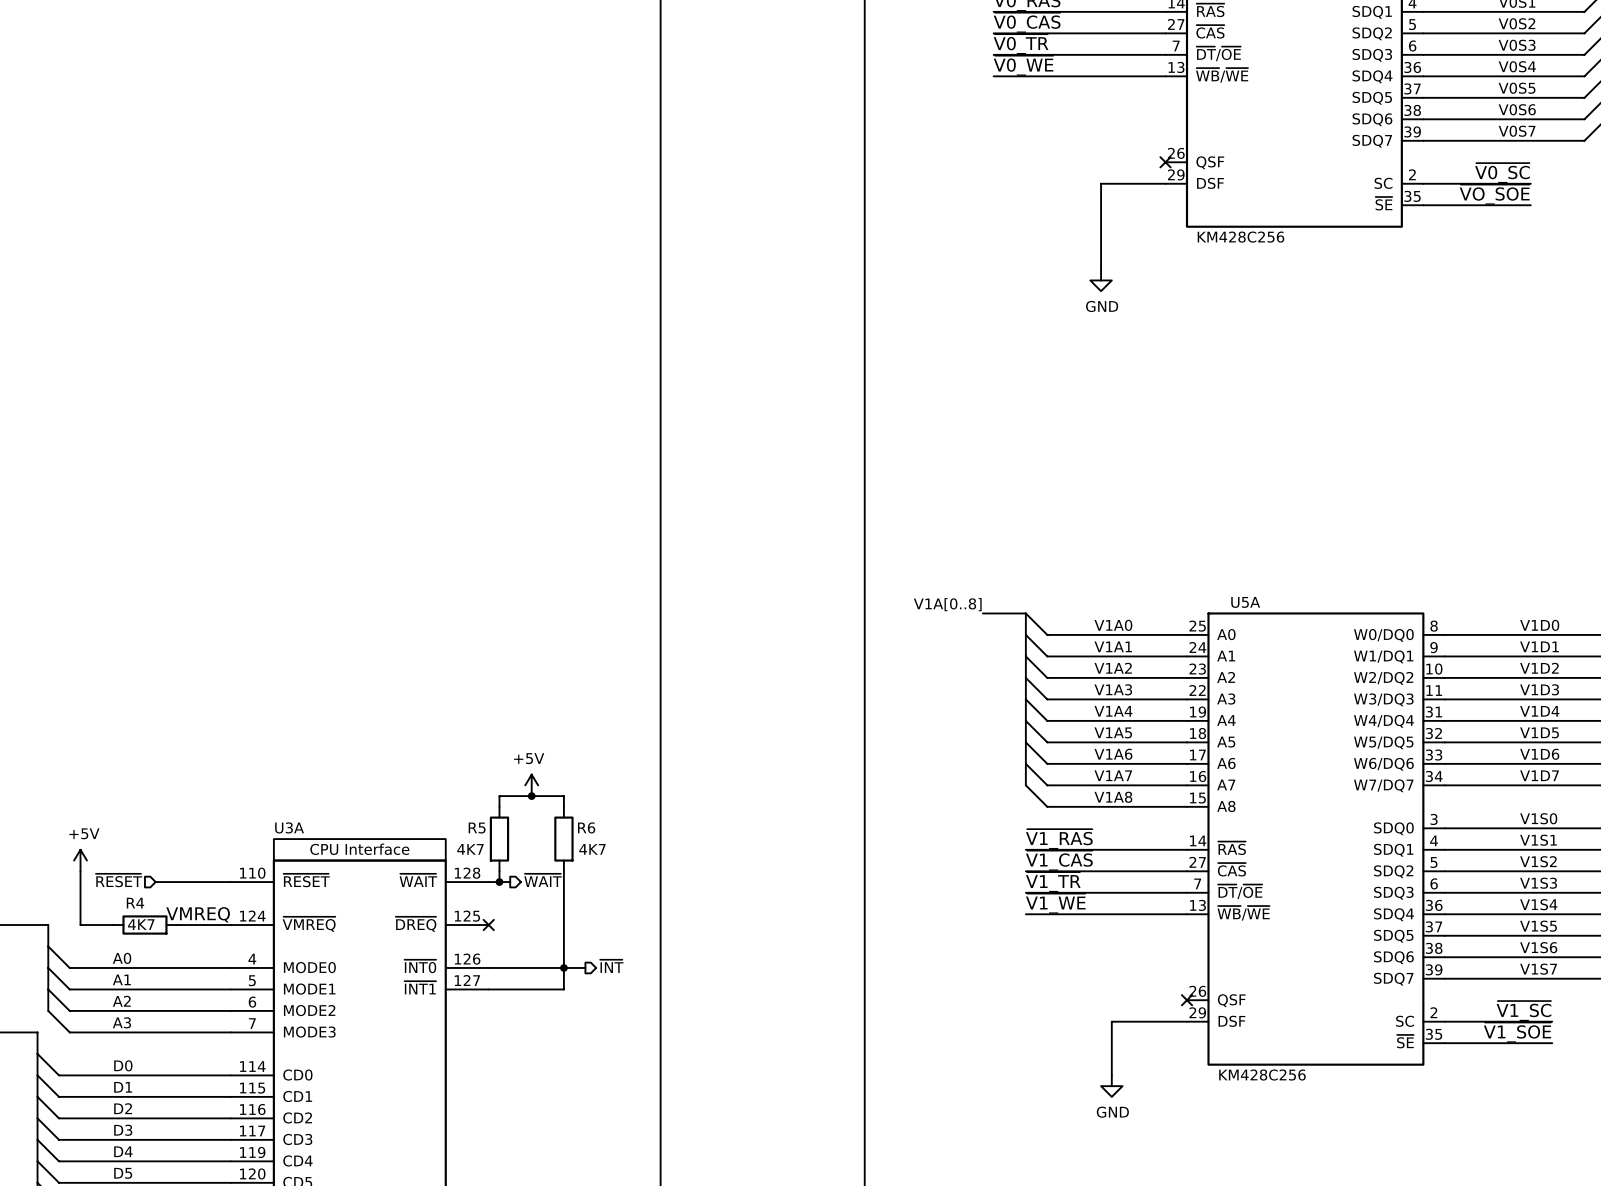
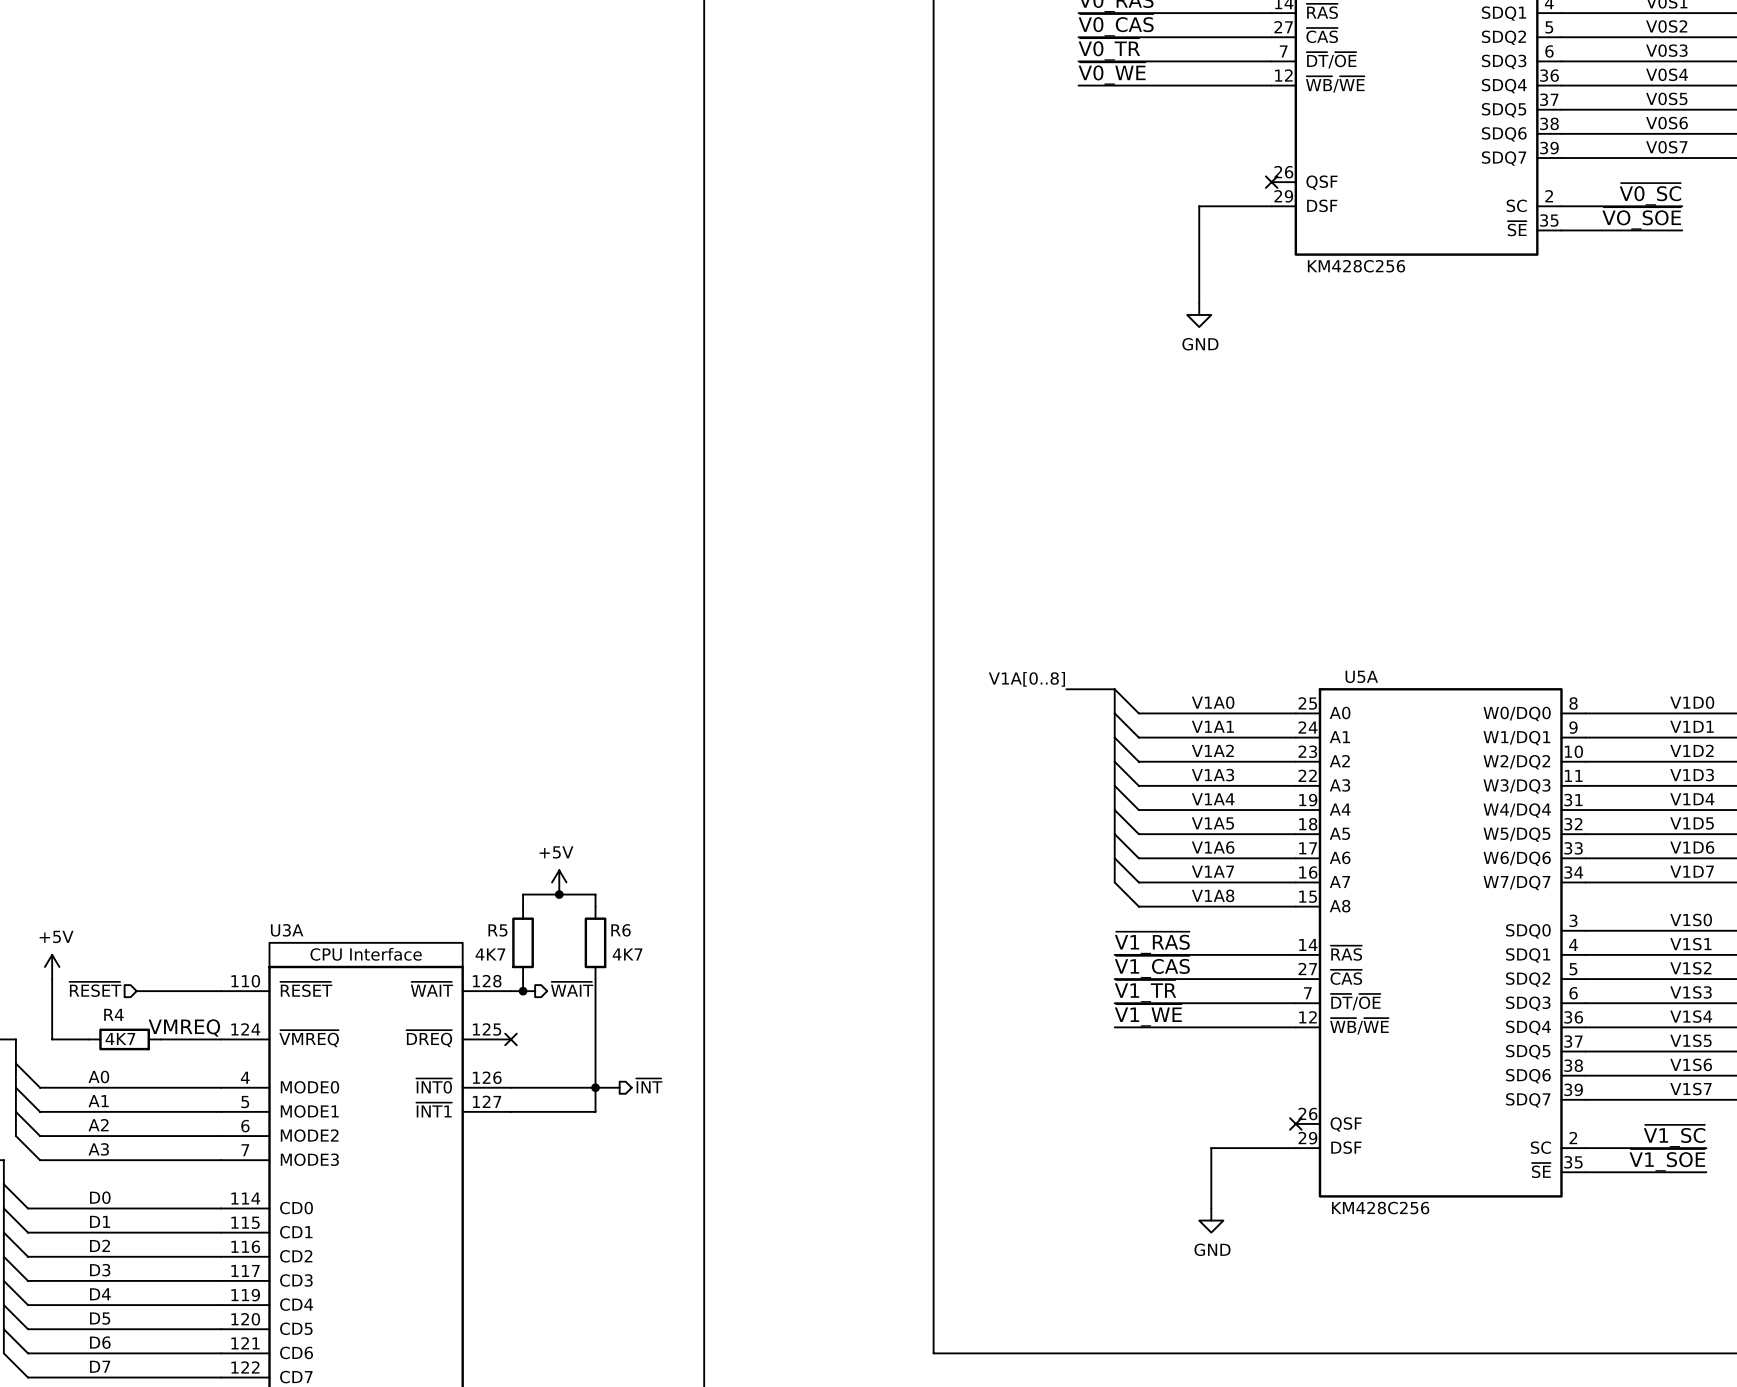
part pin number: 13 (1176, 67) -> 12 (1283, 75)
U5A pin number: 13 (1197, 905) -> 12 (1307, 1017)

